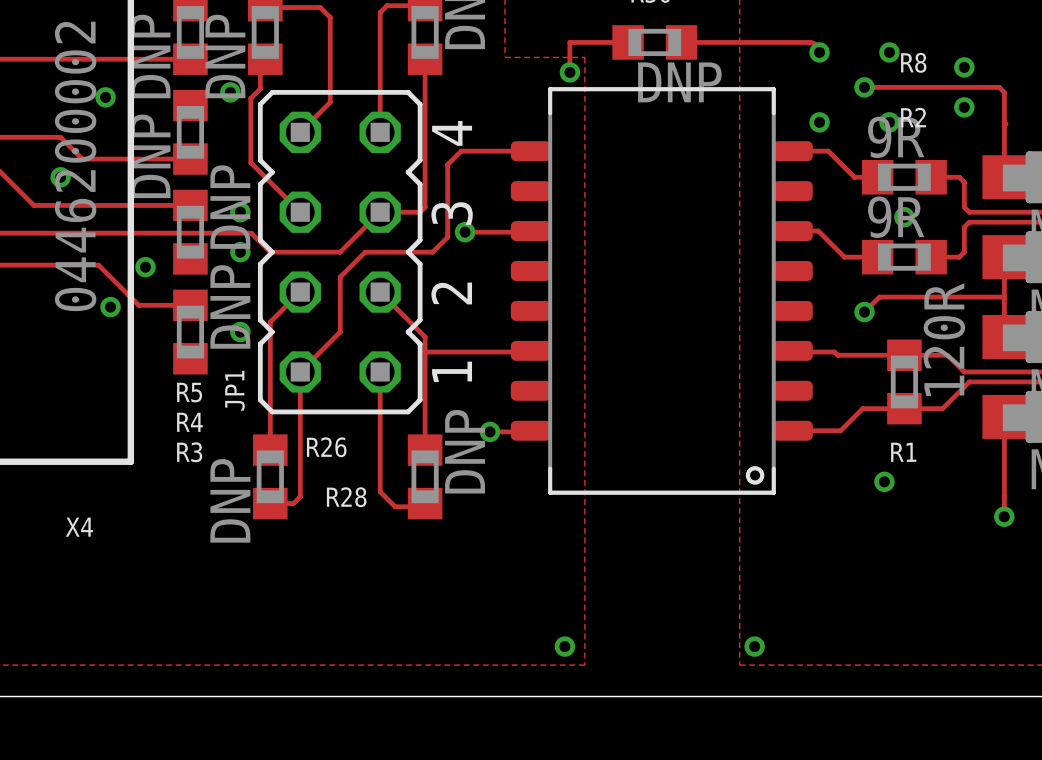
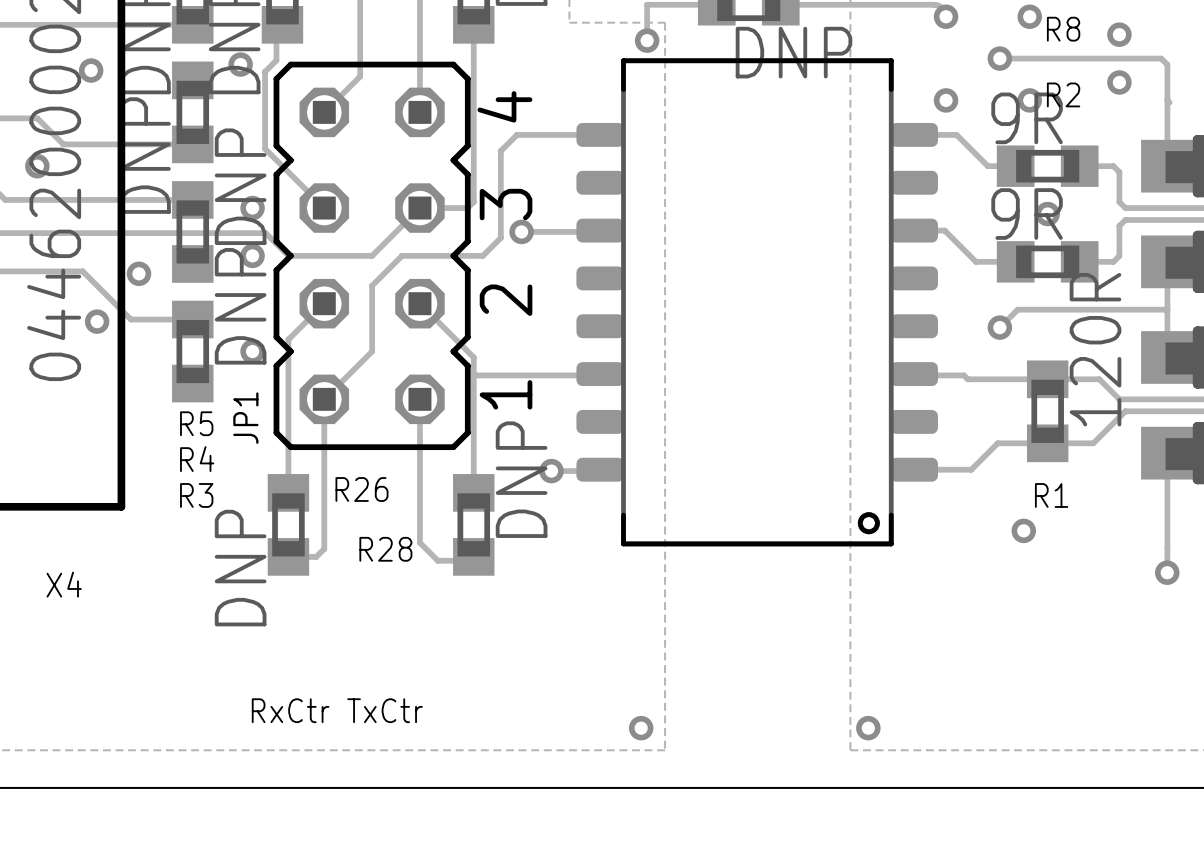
text: none -> RxCtr TxCtr (337, 710)

